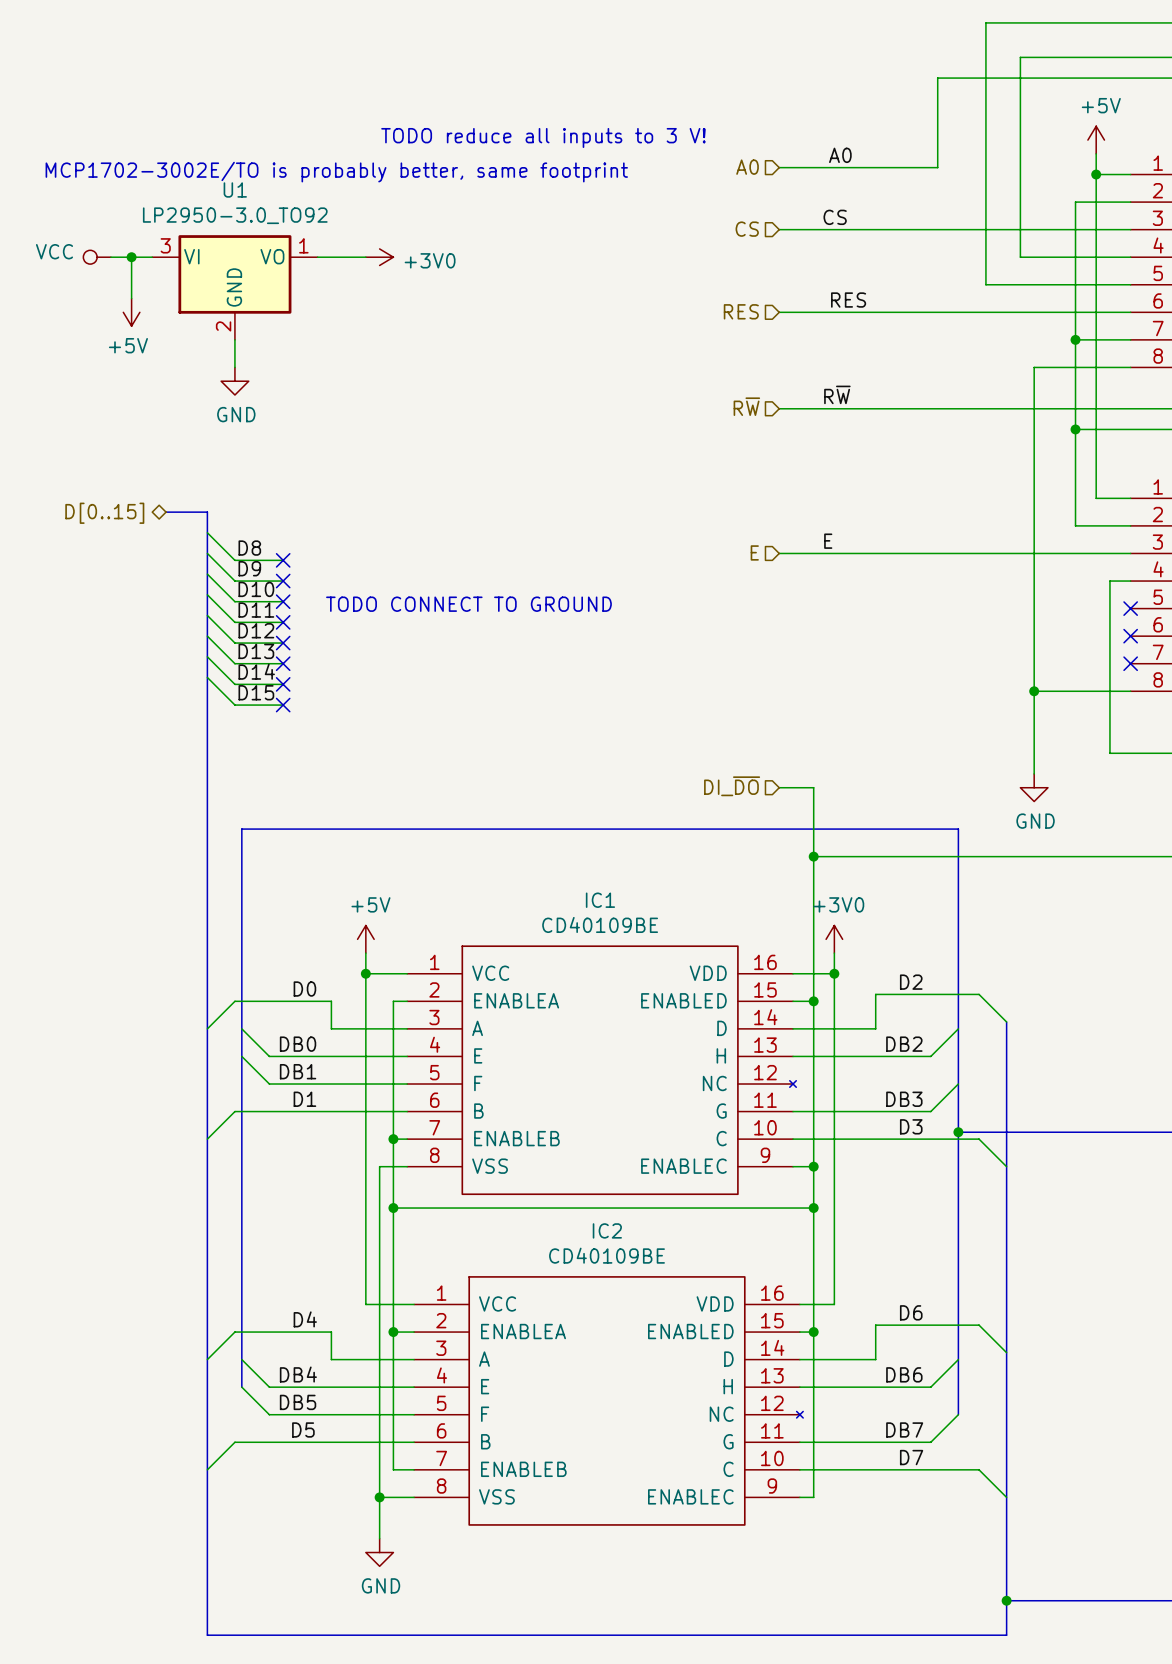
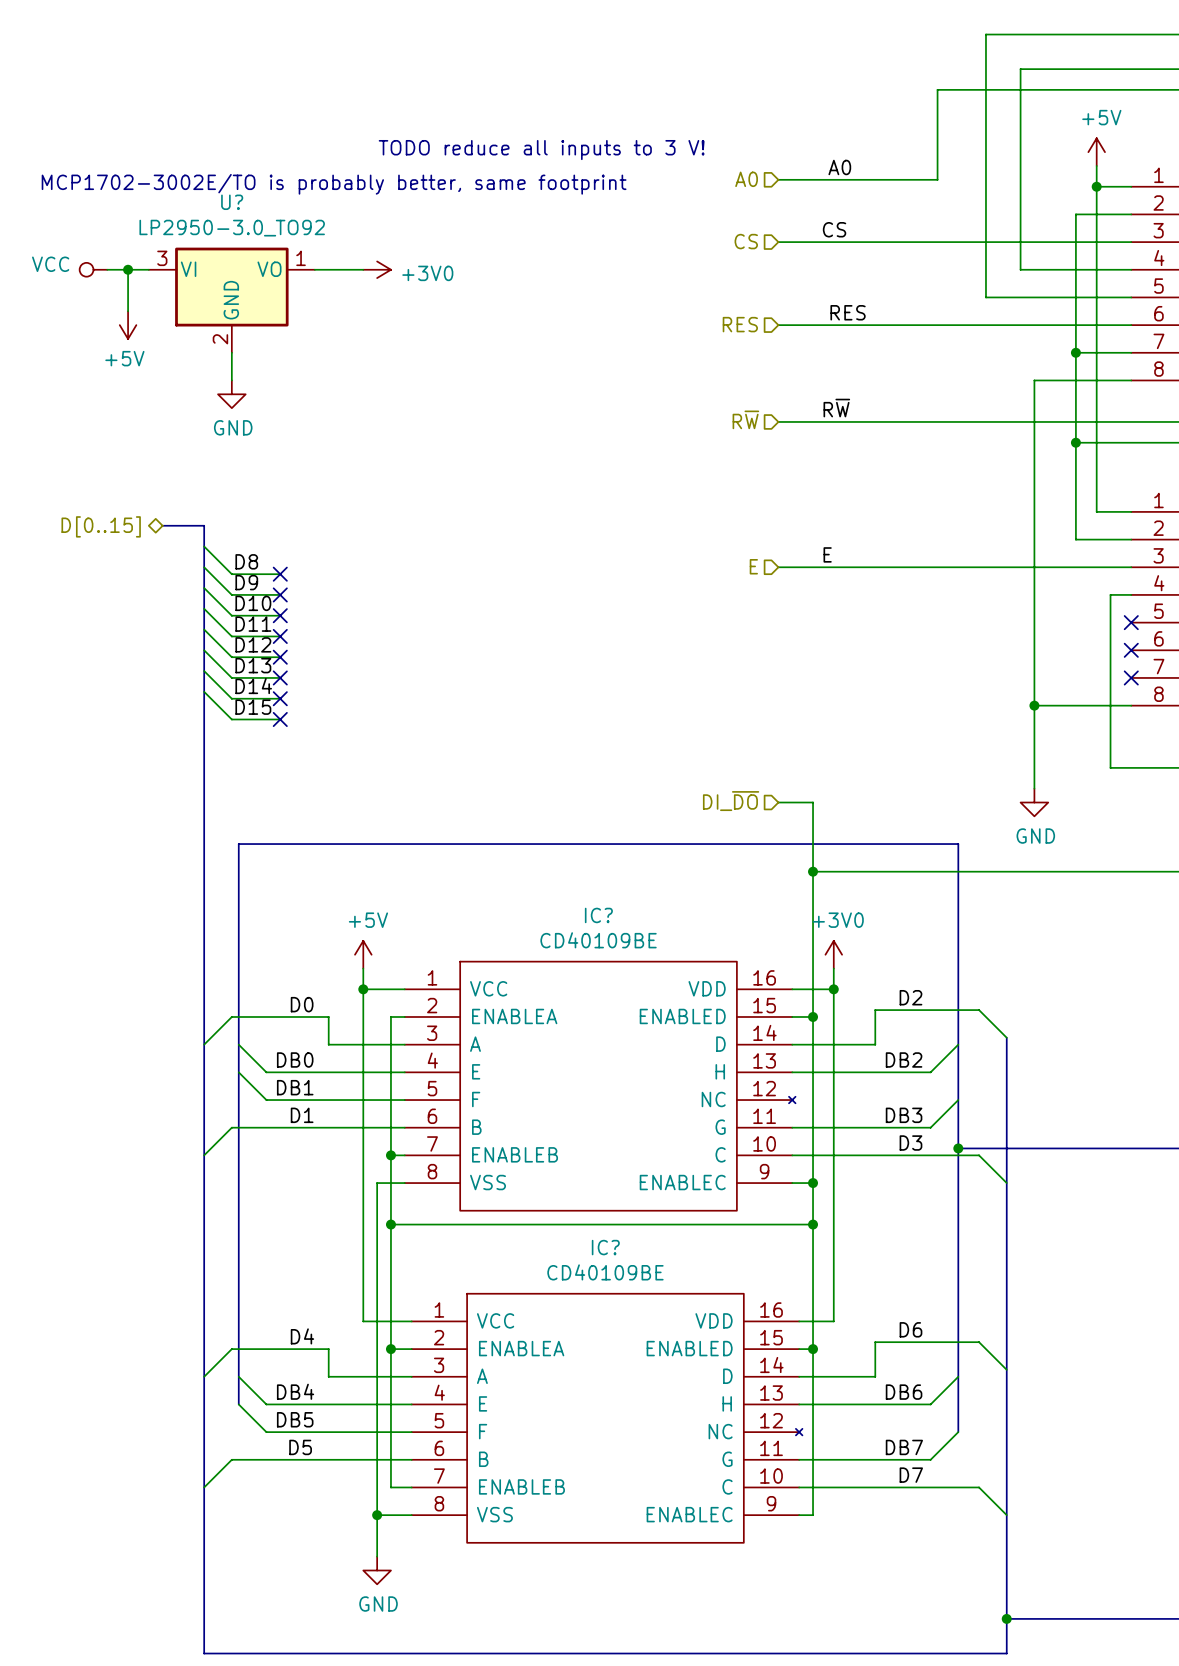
U1 name: U1 (235, 189) -> U? (232, 202)
text: TODO CONNECT TO GROUND (468, 604) -> none
IC1 name: IC1 (600, 900) -> IC? (598, 915)
IC2 name: IC2 (607, 1230) -> IC? (605, 1247)

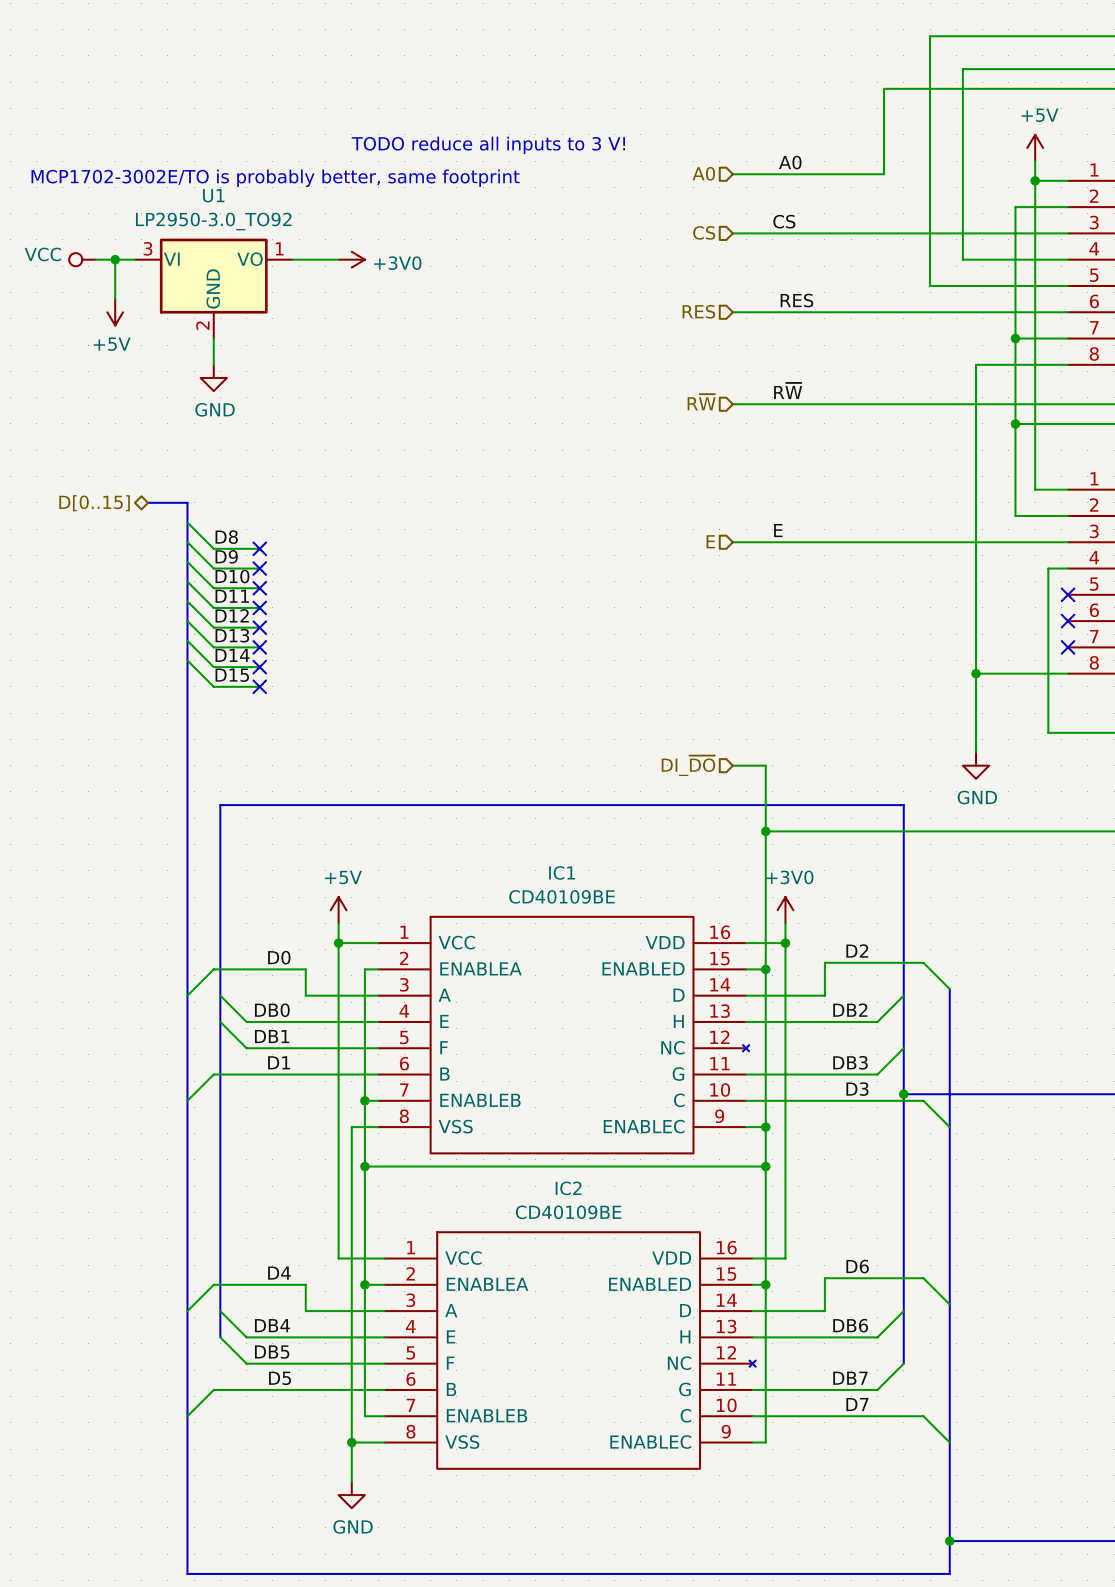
U? name: U? (232, 202) -> U1 (213, 195)
IC? name: IC? (598, 915) -> IC1 (562, 872)
IC? name: IC? (605, 1247) -> IC2 (568, 1188)

